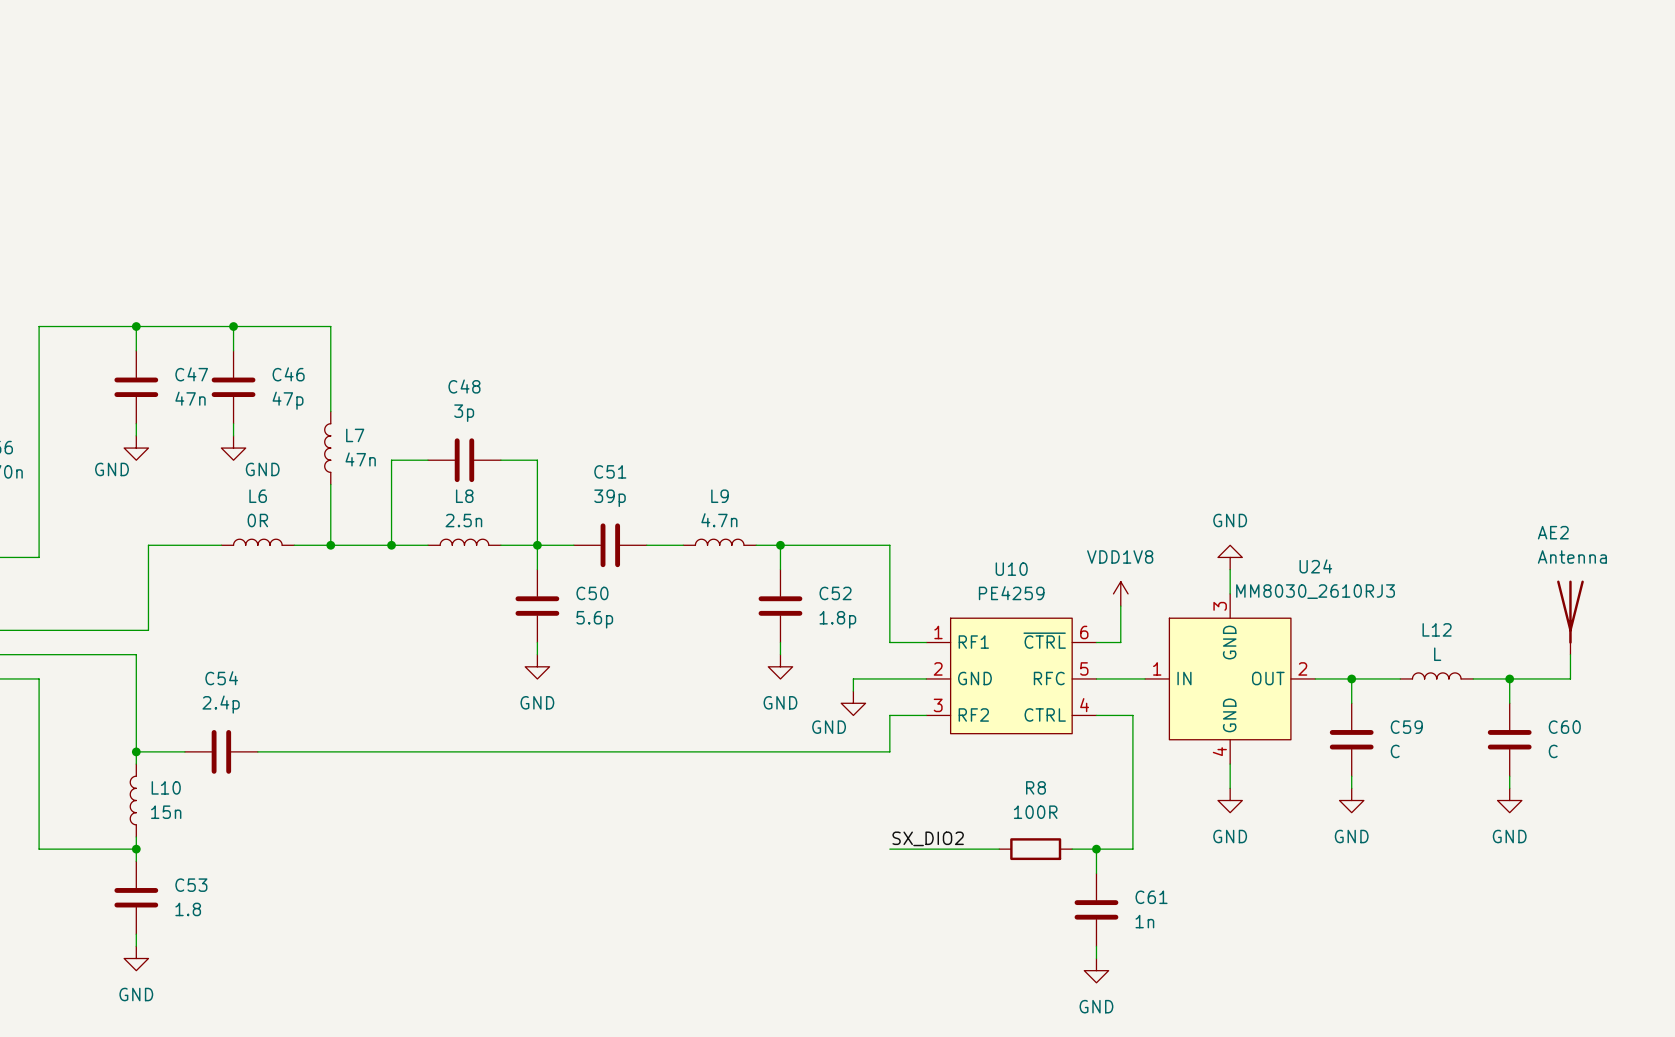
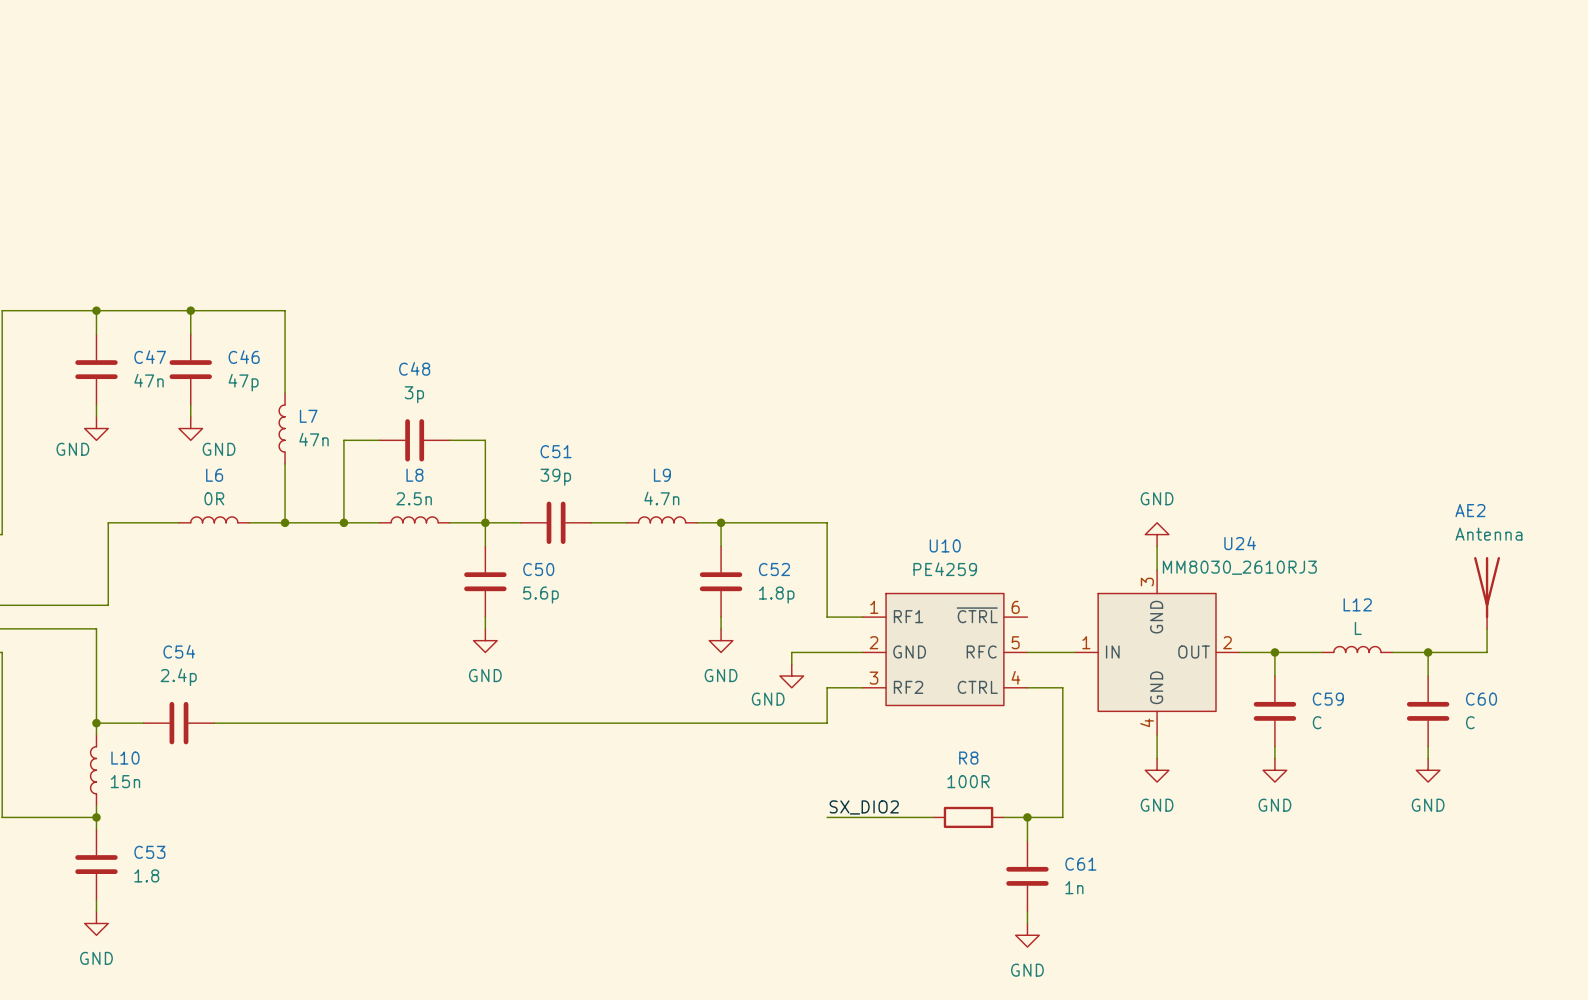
power symbol: VDD1V8 (1120, 593) -> none
wire: (1120, 606) (1120, 642) (1096, 642) -> none

